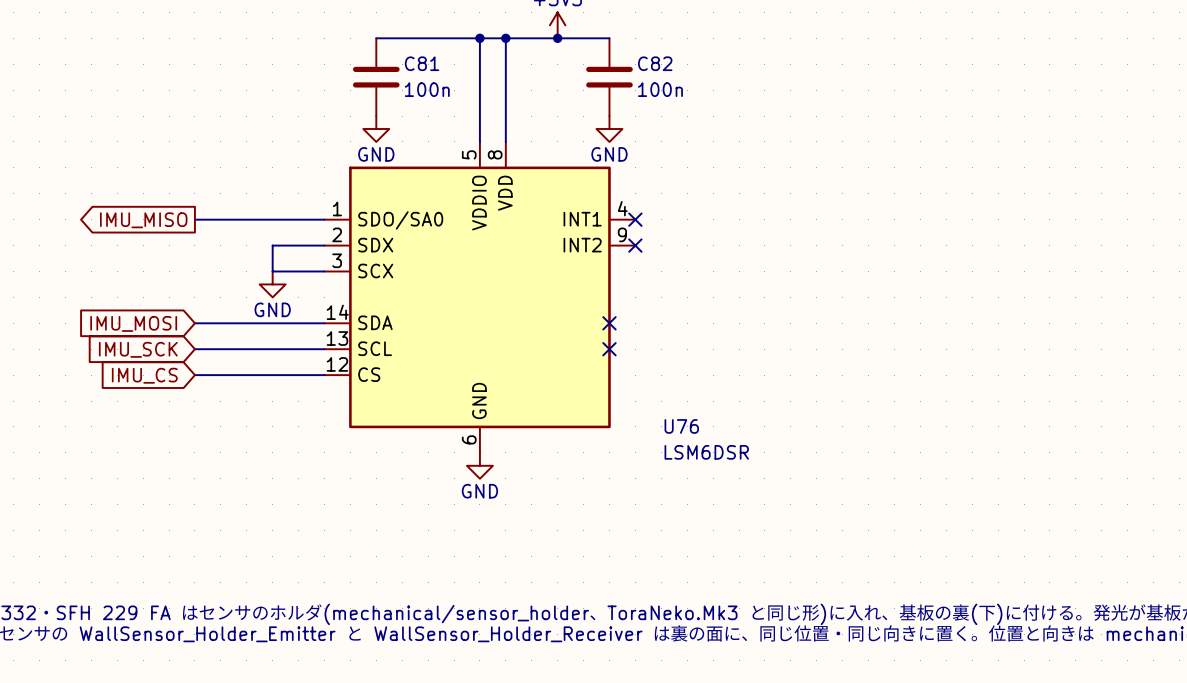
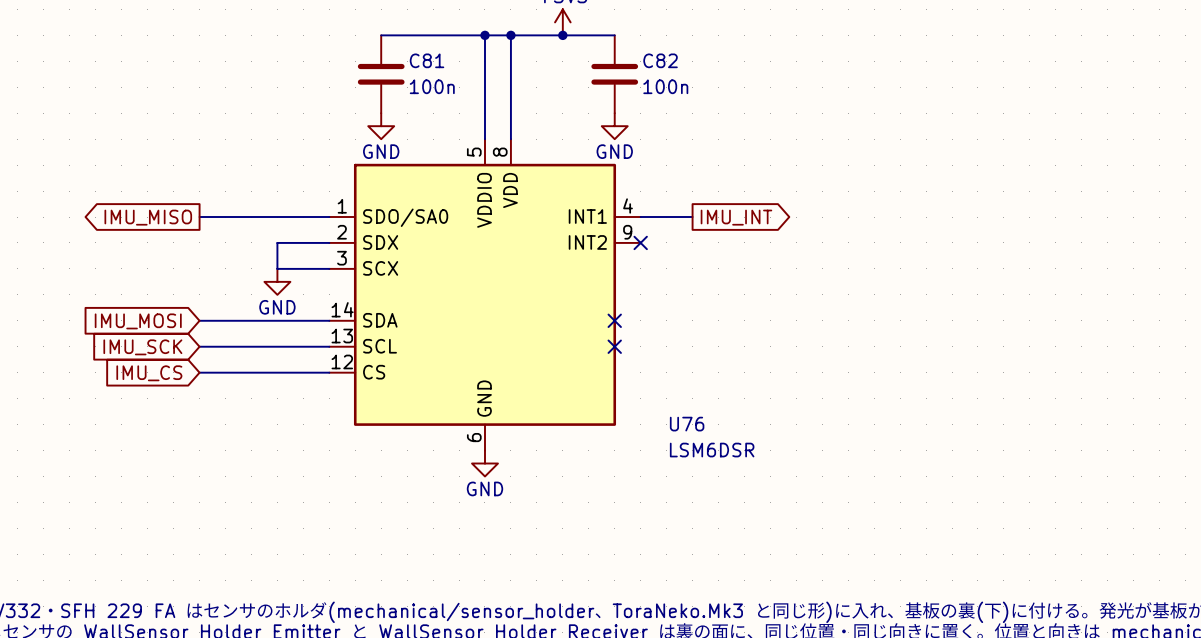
wire: none -> (640, 217) (692, 217)
no-connect mark: (635, 219) -> none
global label: none -> IMU_INT (736, 217)

